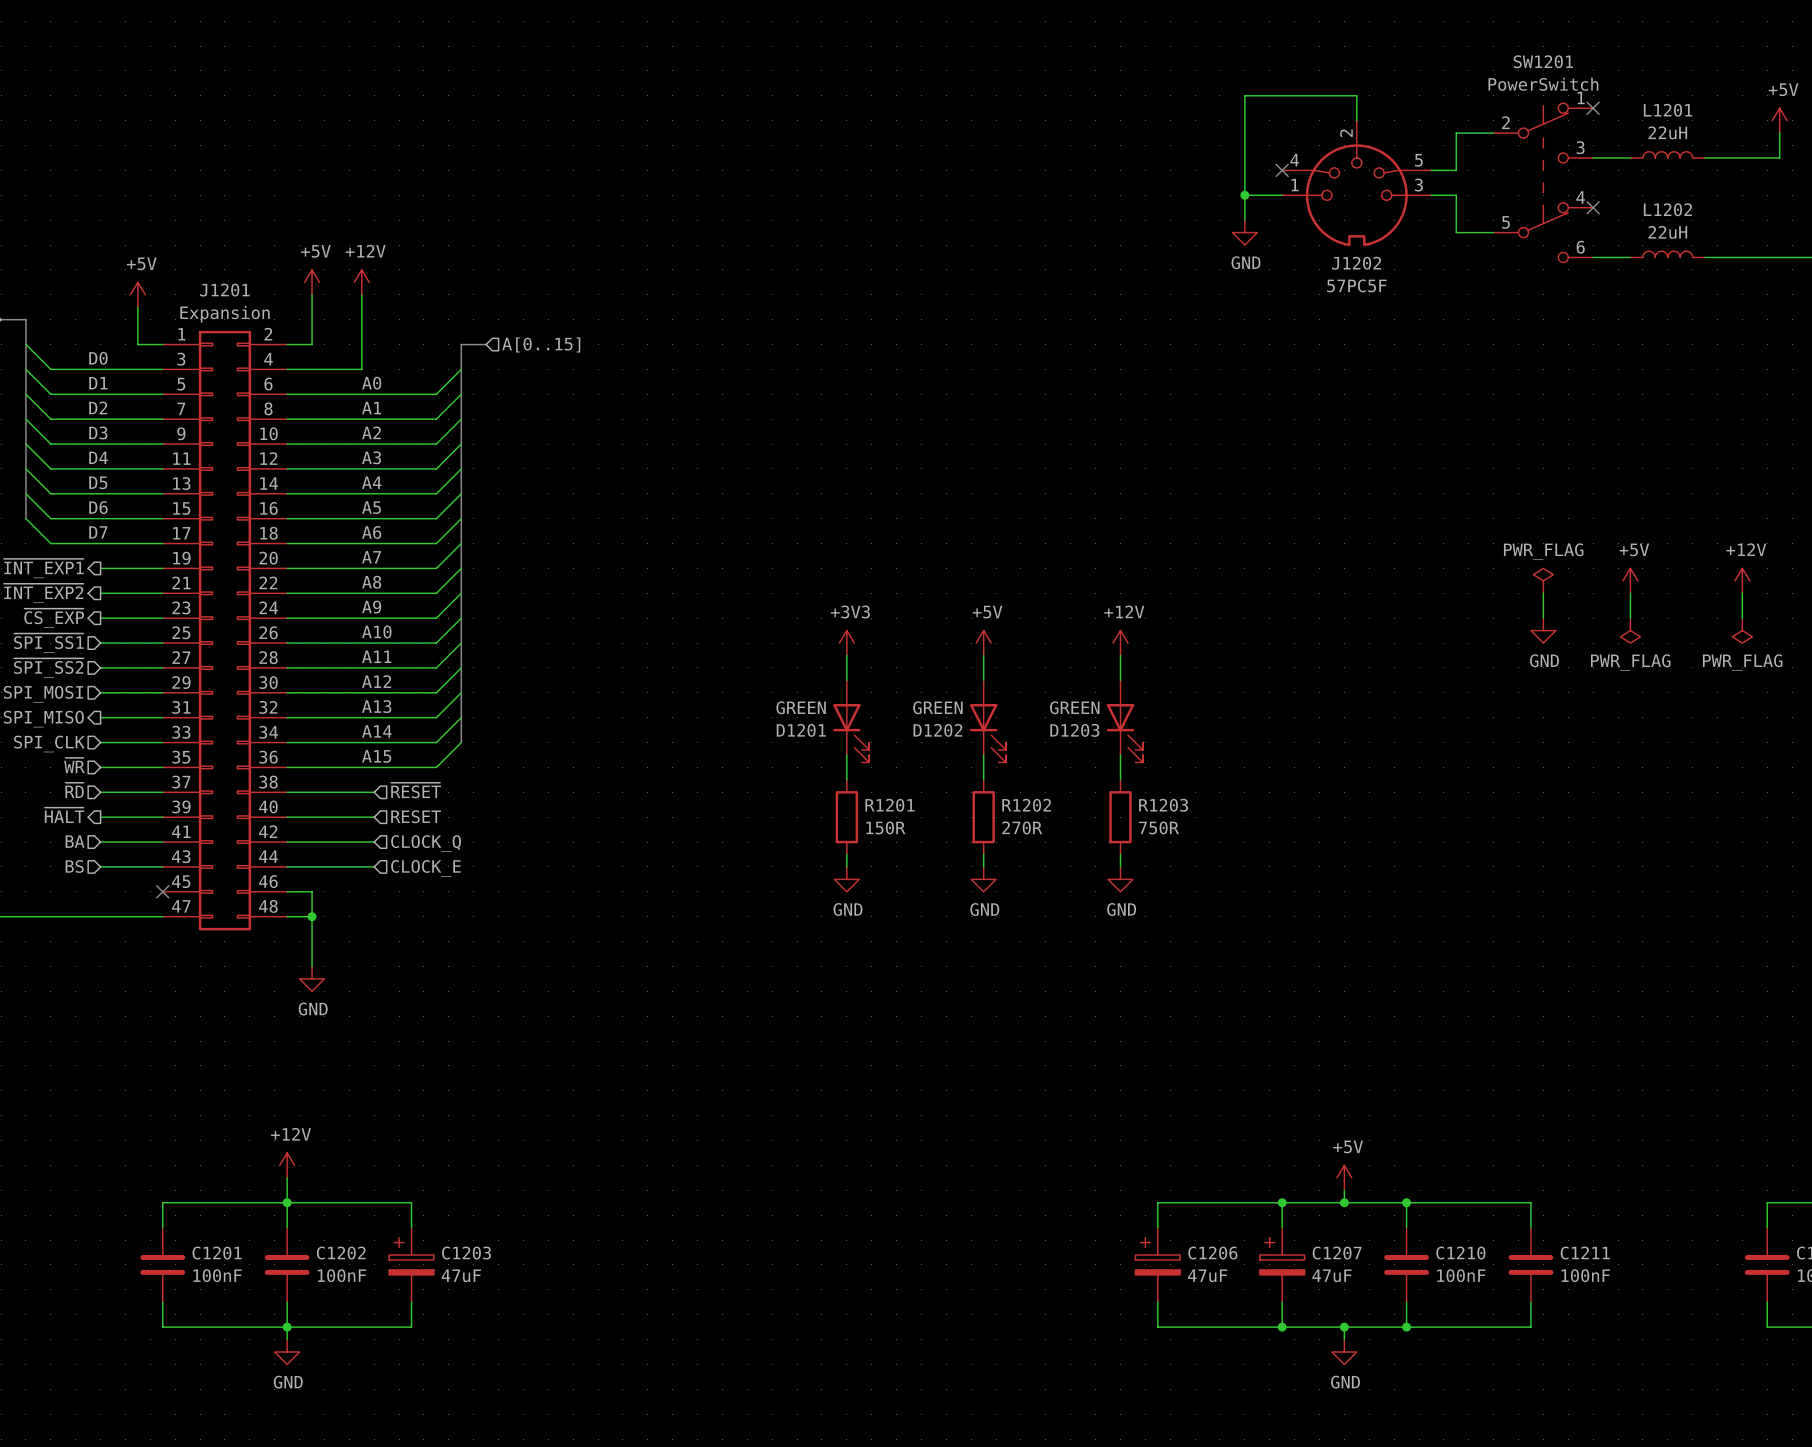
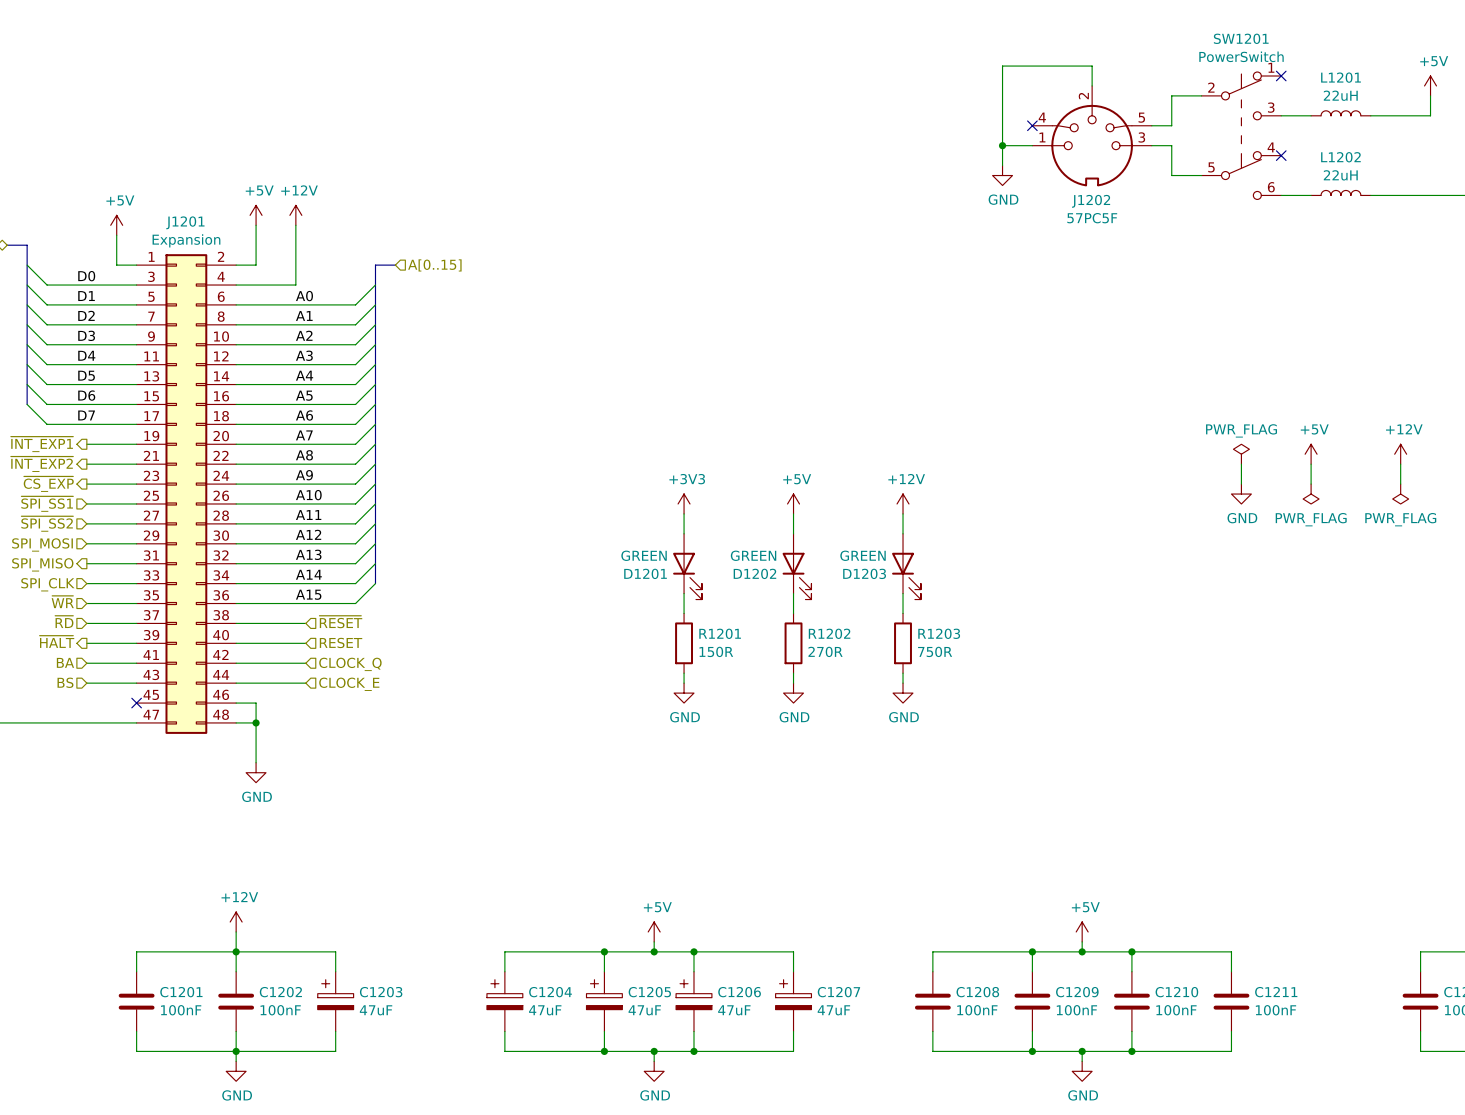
power symbol: none -> +5V (654, 931)
wire: none -> (654, 941) (654, 951)
wire: none -> (604, 951) (604, 971)
junction: none -> (604, 951)
junction: none -> (654, 951)
wire: none -> (693, 951) (693, 971)
junction: none -> (693, 951)
wire: none -> (504, 971) (504, 951) (793, 951) (793, 971)
C1204: none -> 47uF (504, 1001)
C1205: none -> 47uF (604, 1001)
C1206 position: (1157, 1264) -> (693, 1001)
C1208: none -> 100nF (932, 1001)
C1207 position: (1282, 1264) -> (793, 1001)
C1209: none -> 100nF (1032, 1001)
wire: none -> (504, 1031) (504, 1051) (793, 1051) (793, 1031)
wire: none -> (604, 1031) (604, 1051)
wire: none -> (693, 1031) (693, 1051)
junction: none -> (604, 1051)
wire: none -> (654, 1051) (654, 1061)
junction: none -> (654, 1051)
junction: none -> (693, 1051)
power symbol: none -> GND (654, 1071)

